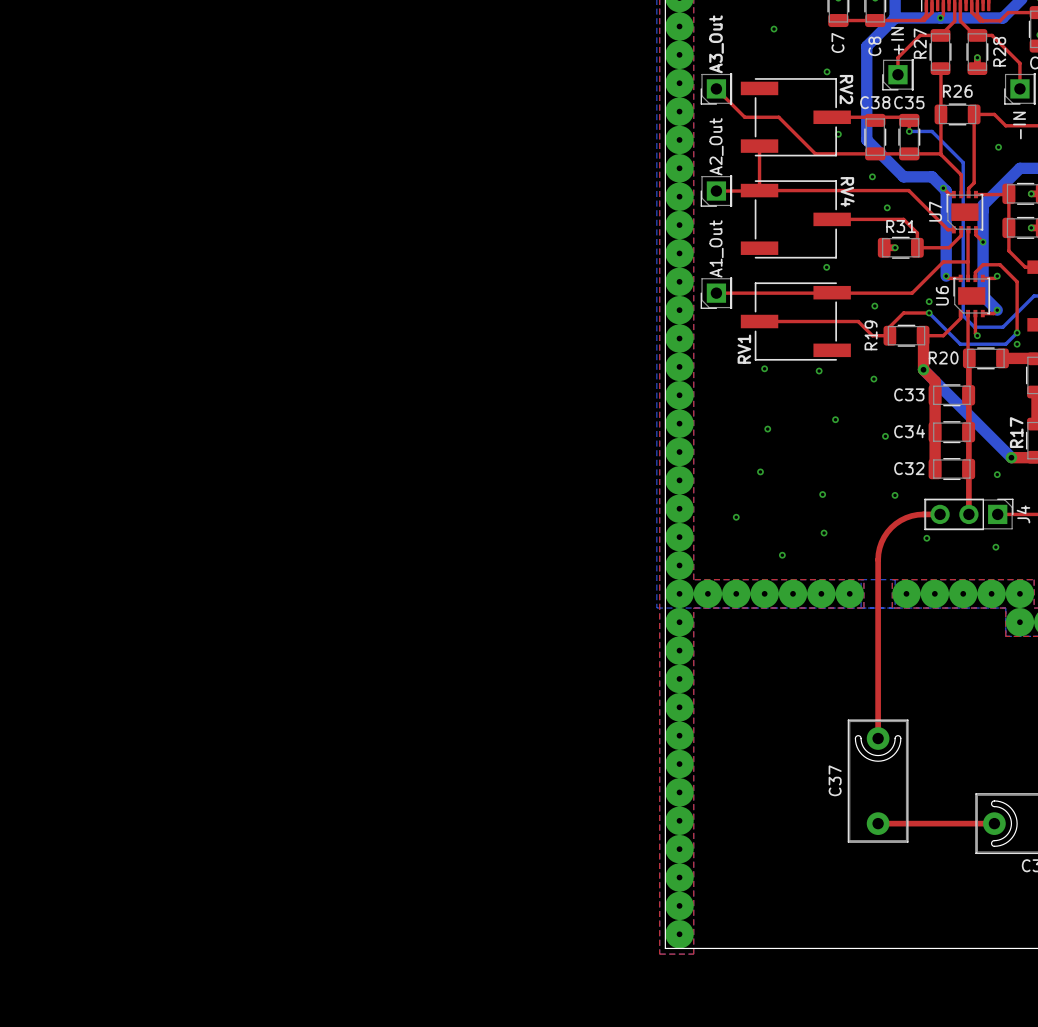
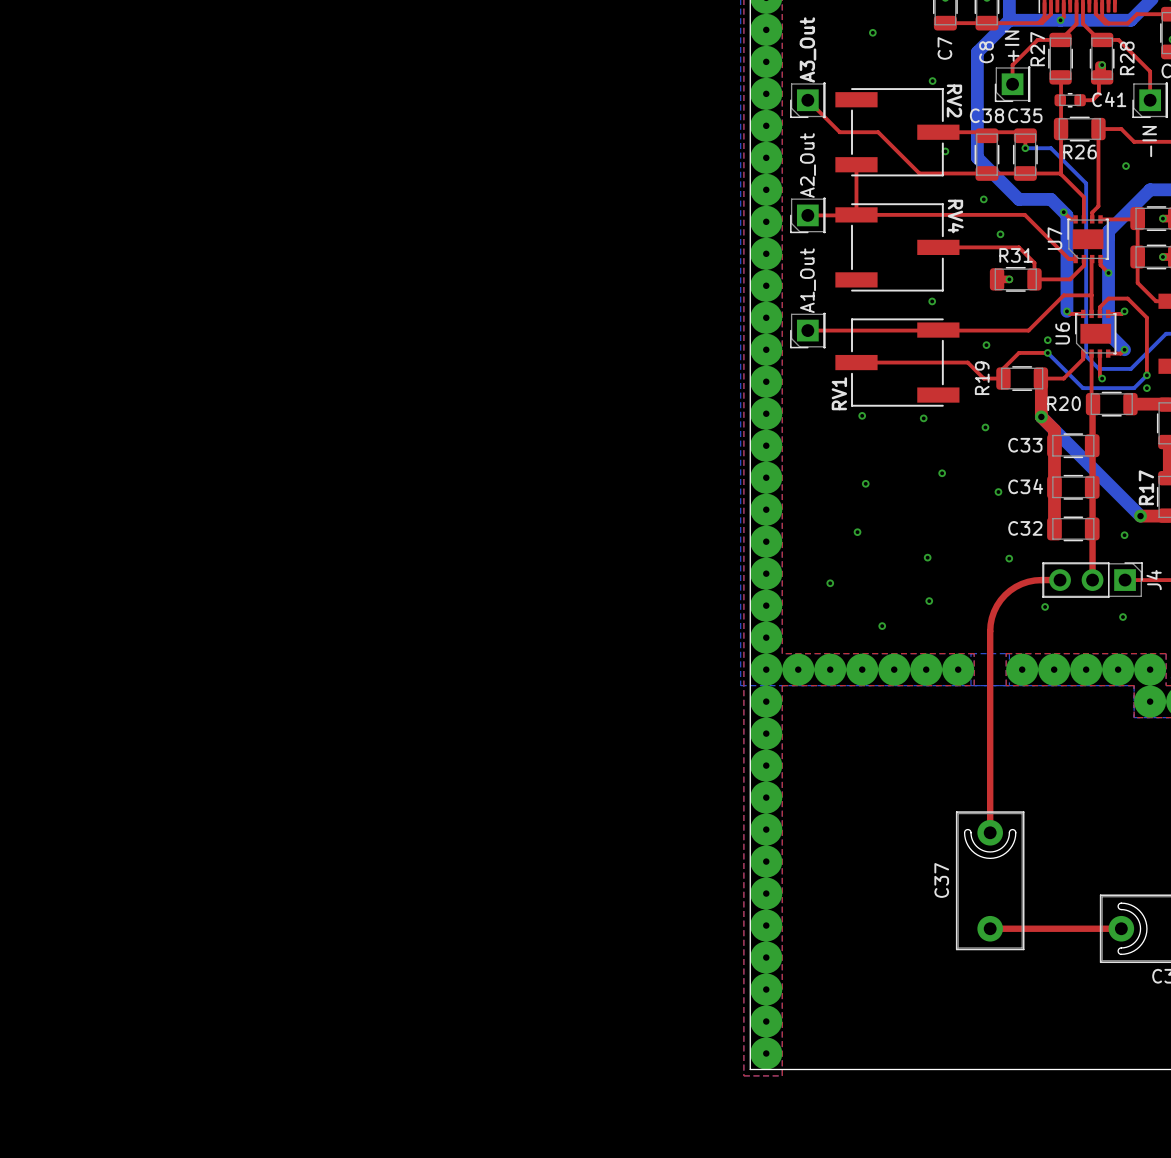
top track: none -> (1098, 65) (1098, 93) (1092, 100) (1080, 100)
C41: none -> (1070, 100)
R26 name position: R26 (957, 91) -> R26 (1080, 152)

